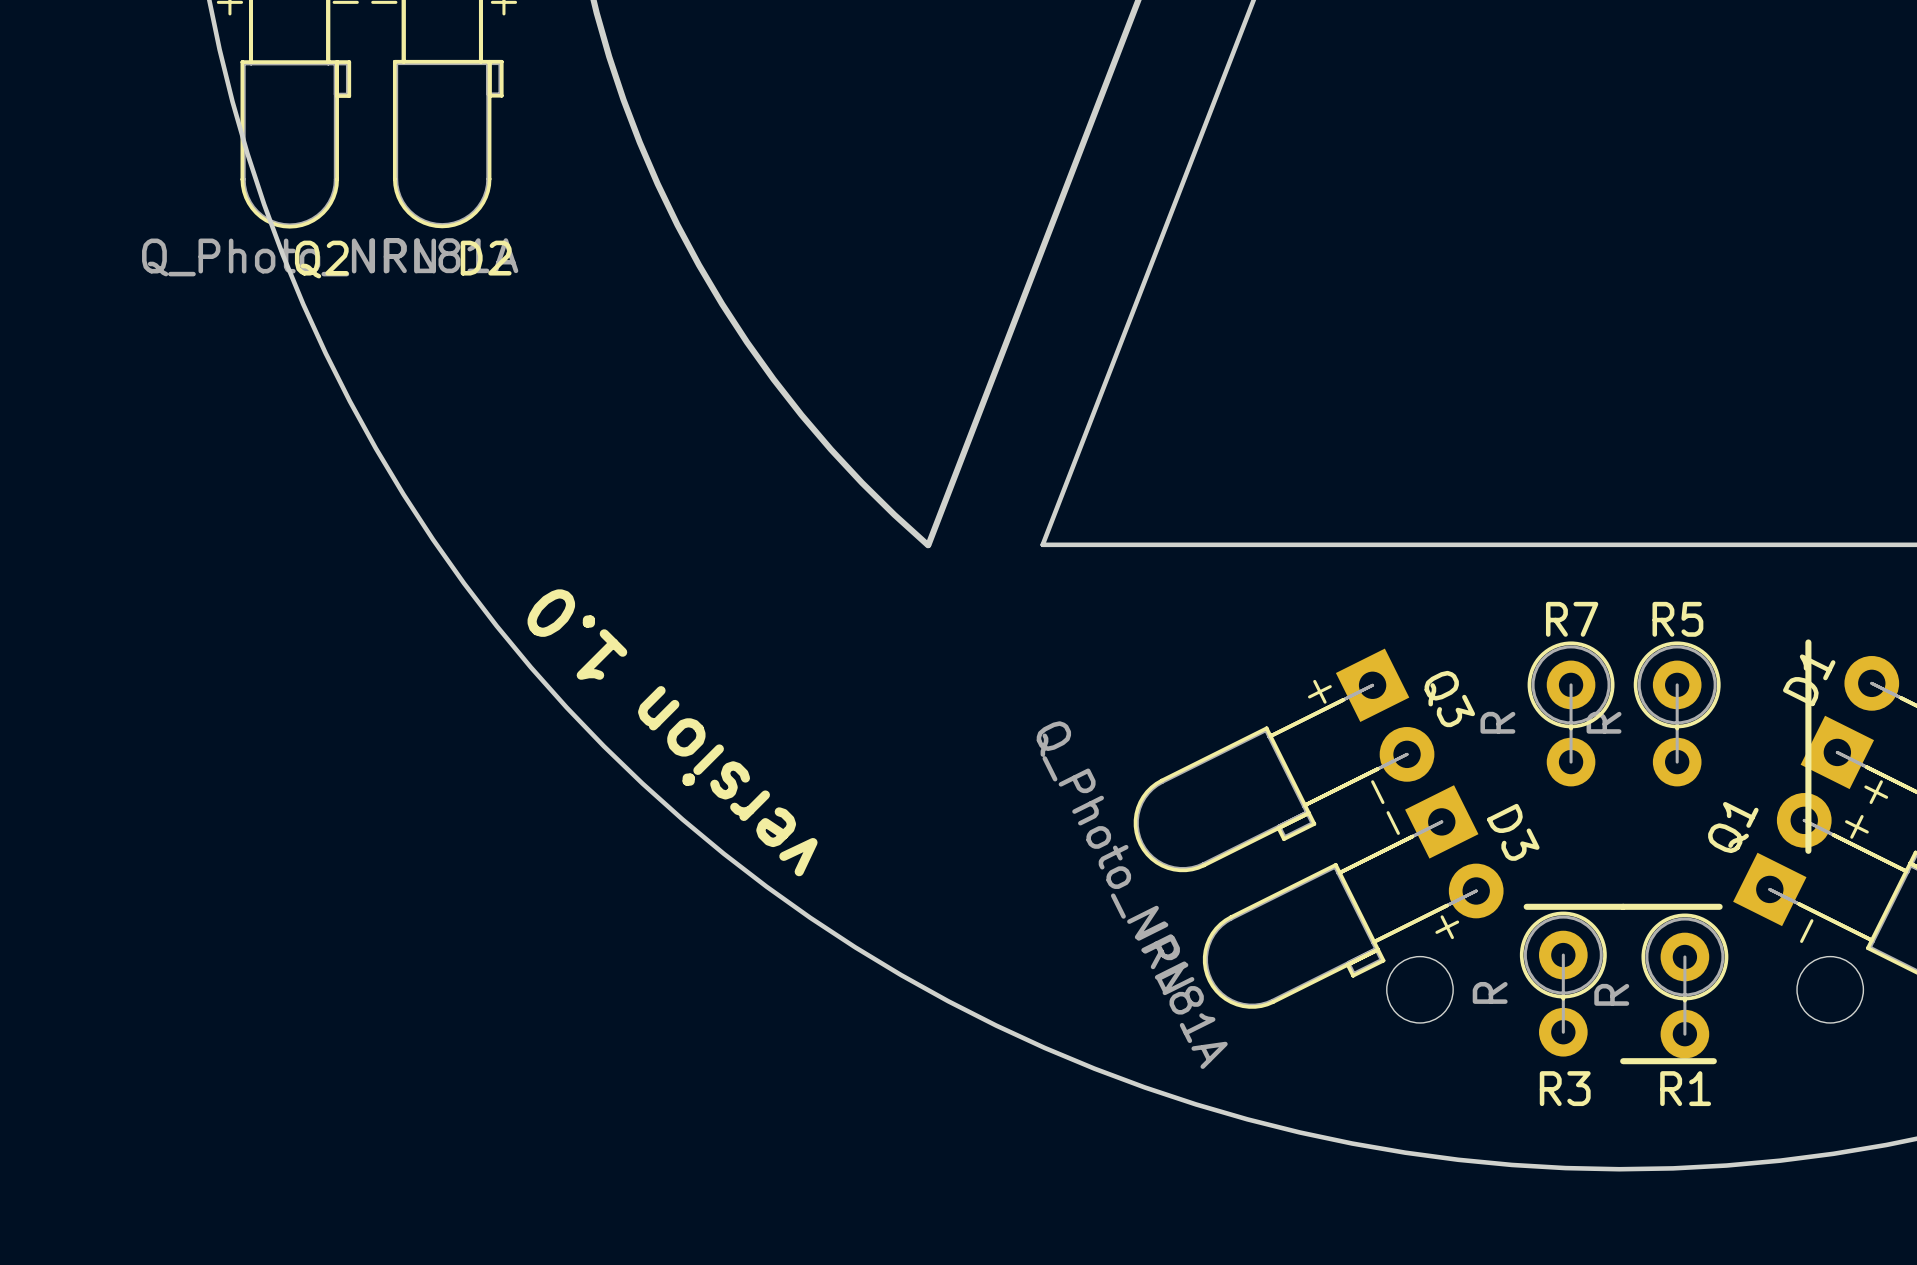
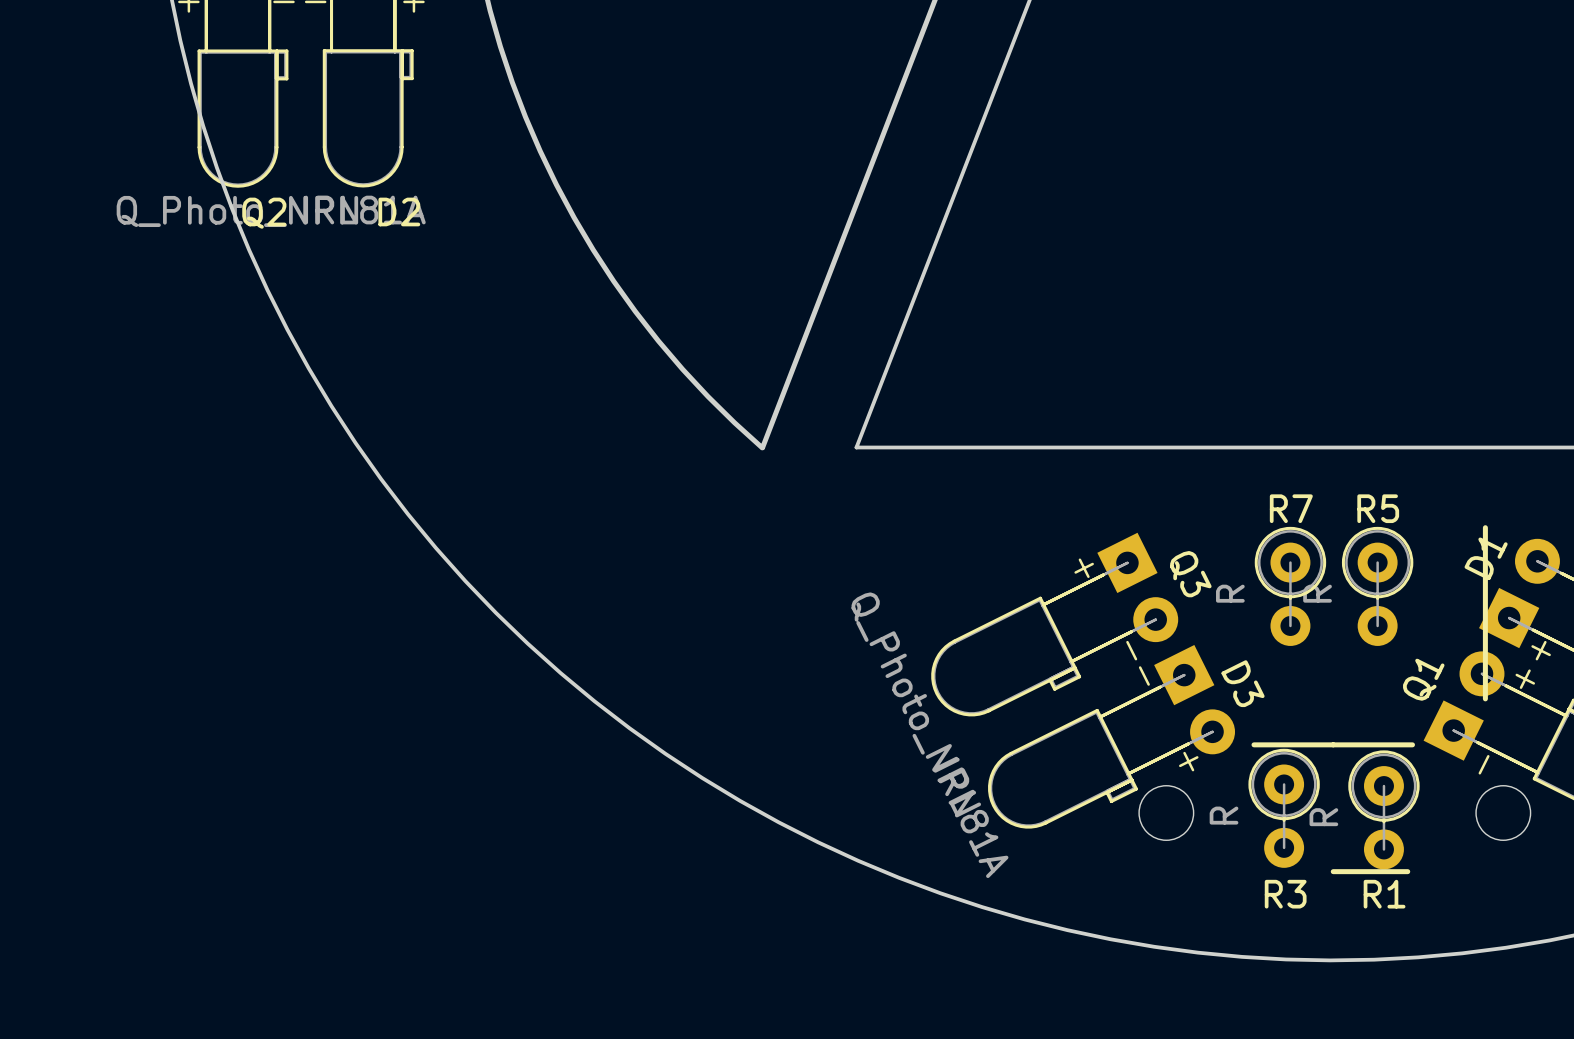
text: version 1.0 (672, 732) -> none

